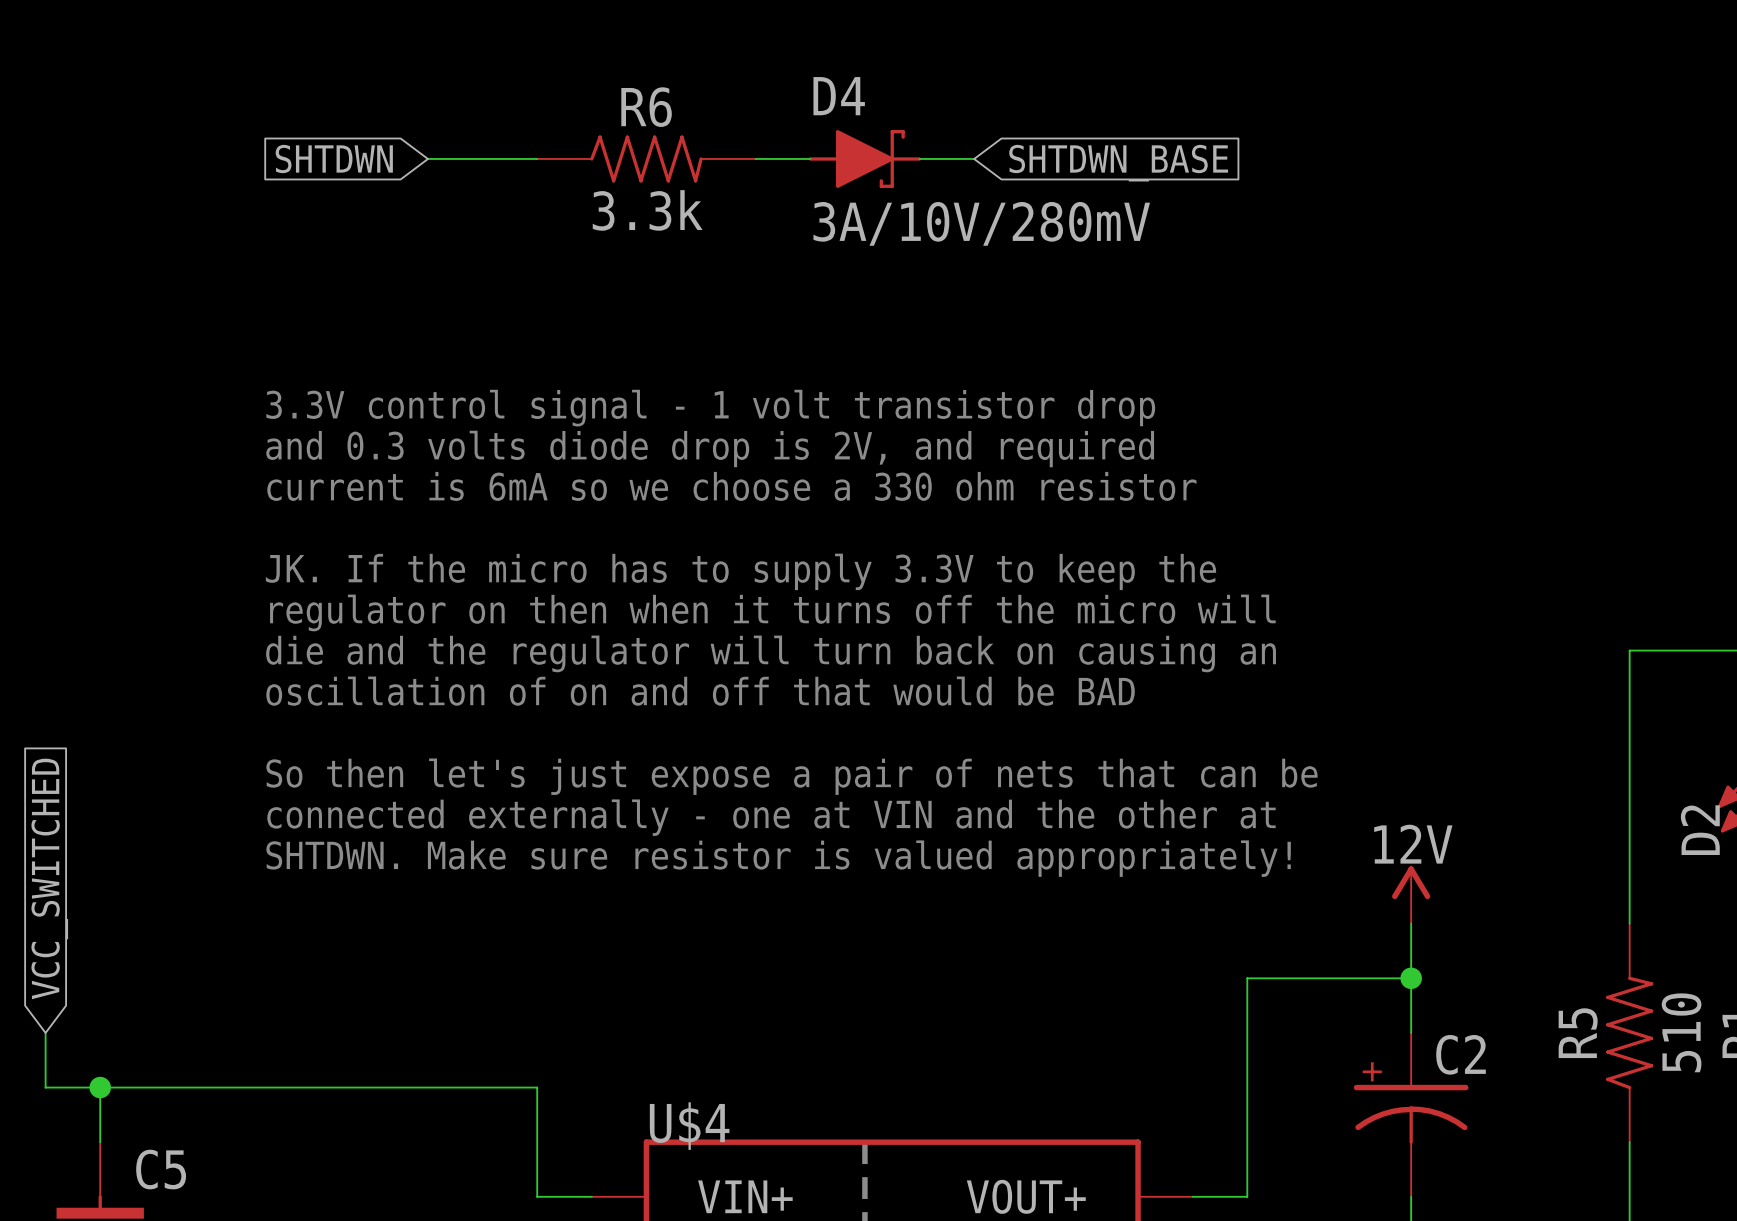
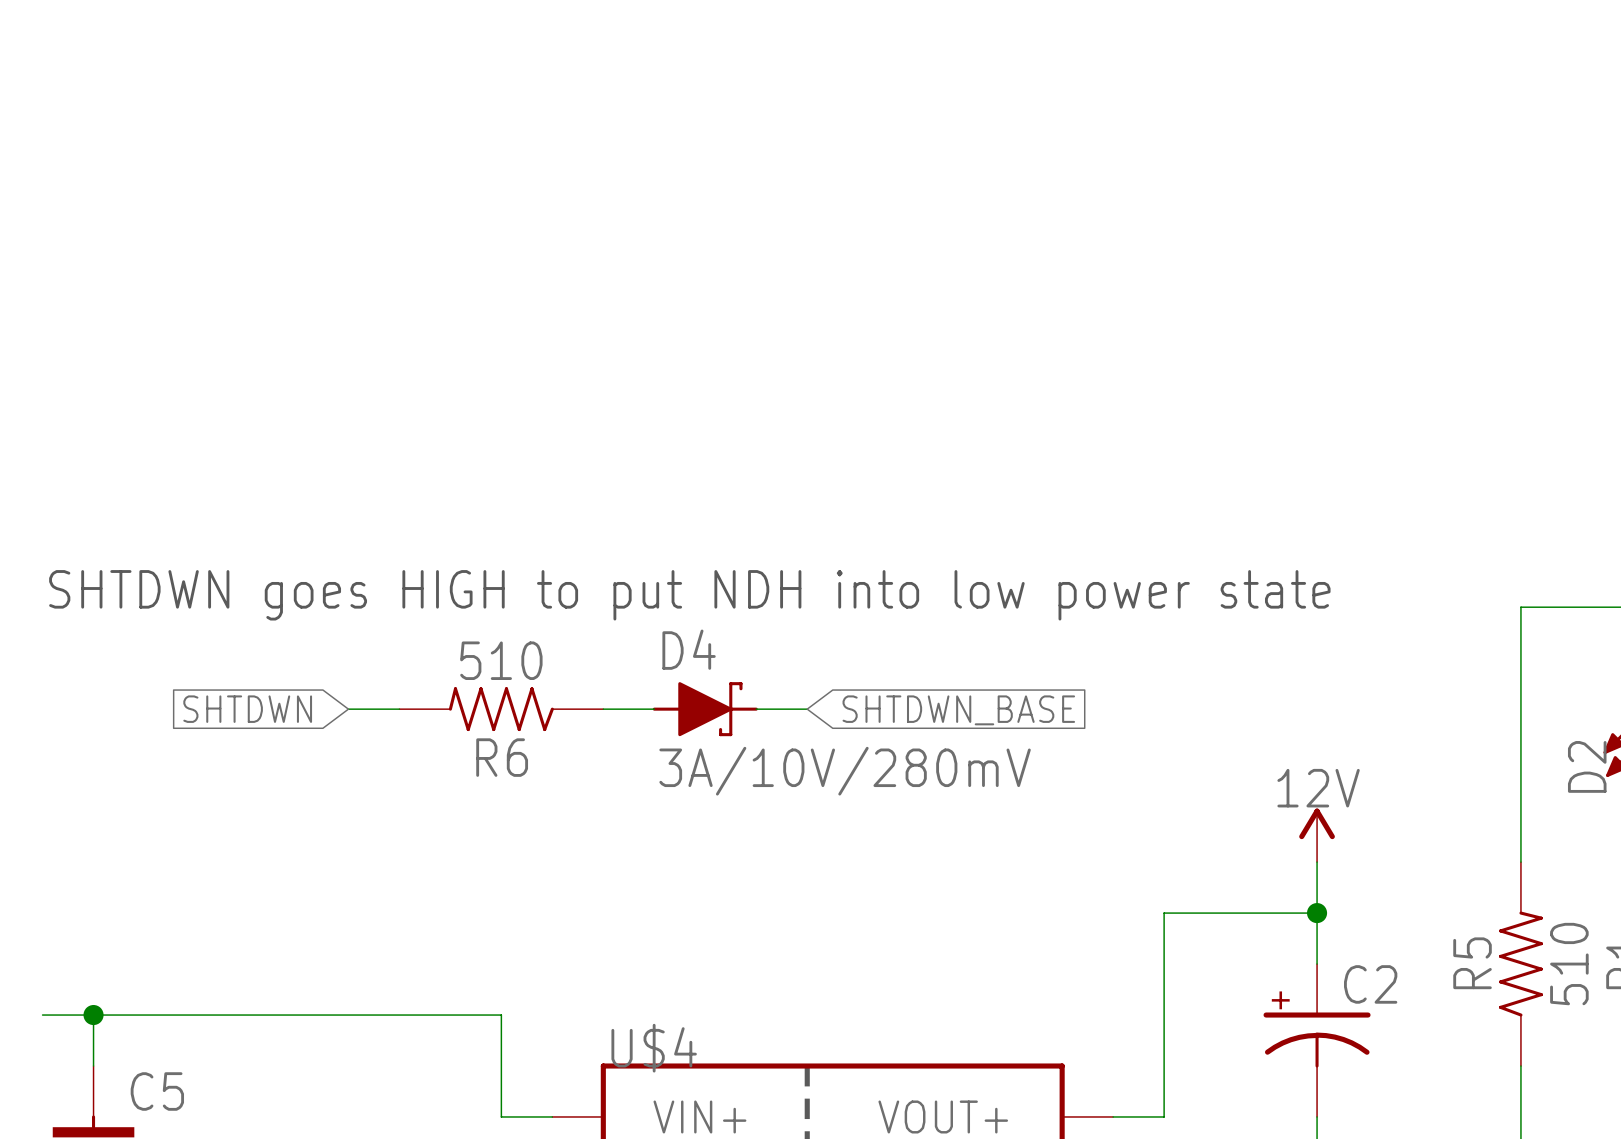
wire: (427, 158) (537, 158) -> none
R6 rotation: 0° (646, 158) -> 180° (501, 709)
R6 position: (646, 158) -> (501, 709)
wire: (755, 158) (810, 158) -> none
D4 position: (864, 158) -> (705, 709)
wire: (919, 158) (974, 158) -> none
global label: SHTDWN (334, 159) -> none
global label: SHTDWN_BASE (1118, 163) -> none
R6 value: 3.3k (647, 210) -> 510 (501, 660)
text: 3.3V control signal - 1 volt transistor drop (710, 408) -> none
text: and 0.3 volts diode drop is 2V, and required (710, 449) -> none
text: current is 6mA so we choose a 330 ohm resistor (731, 486) -> none
text: JK. If the micro has to supply 3.3V to keep the (740, 571) -> none
text: regulator on then when it turns off the micro will (772, 612) -> none
text: none -> SHTDWN goes HIGH to put NDH into low power state (689, 595)
text: die and the regulator will turn back on causing an (771, 653) -> none
text: oscillation of on and off that would be BAD (700, 691) -> none
global label: none -> SHTDWN (247, 709)
wire: none -> (348, 709) (399, 709)
wire: none -> (603, 709) (654, 709)
wire: none -> (756, 709) (807, 709)
global label: none -> SHTDWN_BASE (958, 710)
text: So then let's just expose a pair of nets that can be (791, 776) -> none
text: connected externally - one at VIN and the other at (771, 817) -> none
text: SHTDWN. Make sure resistor is valued appropriately! (778, 858) -> none
global label: VCC_SWITCHED (49, 878) -> none
wire: (45, 1032) (45, 1087) -> none

